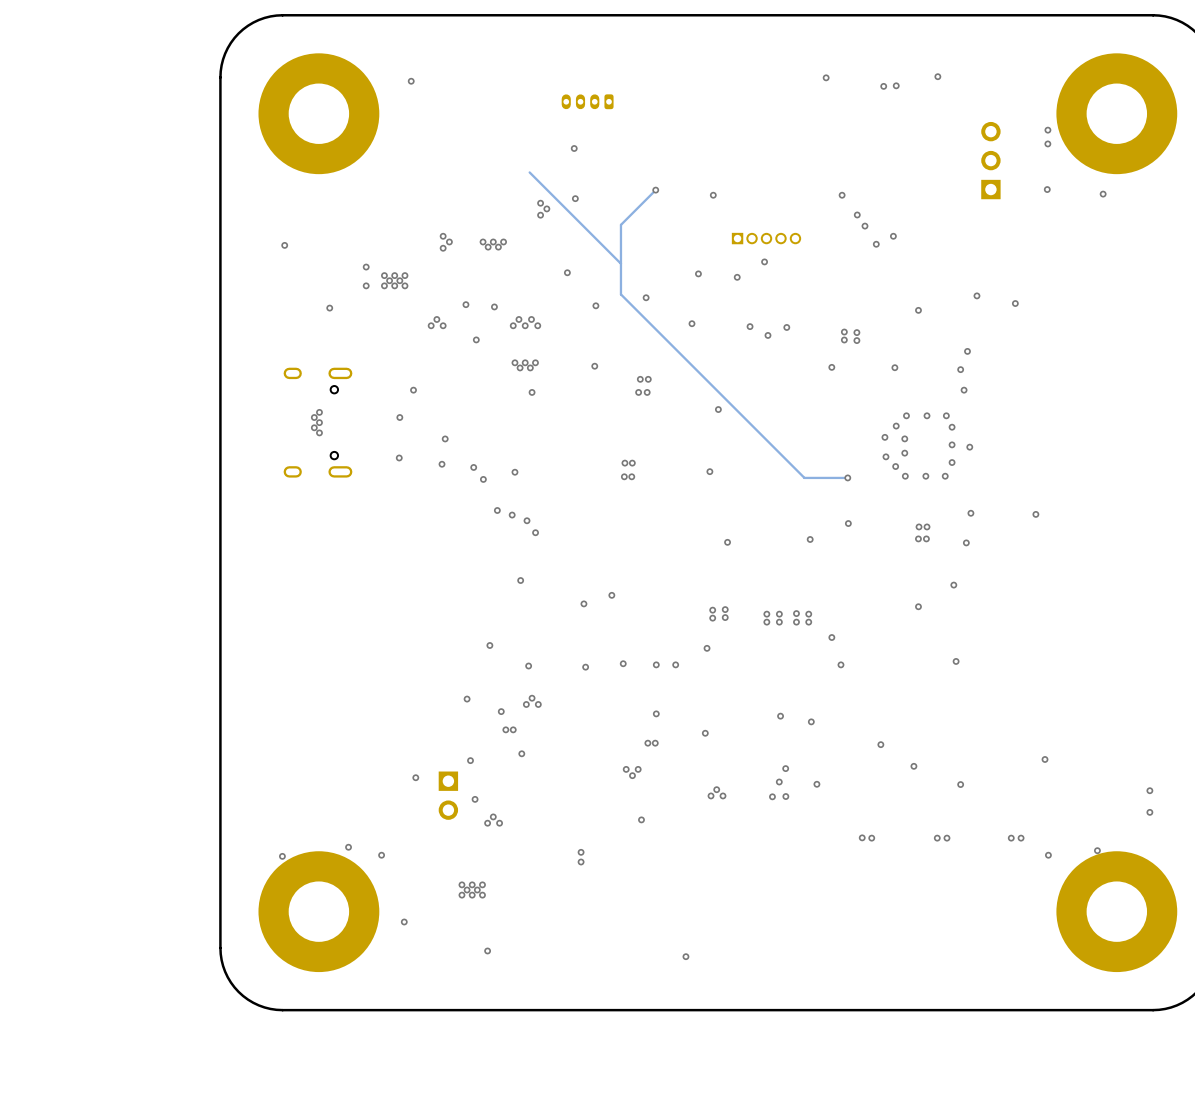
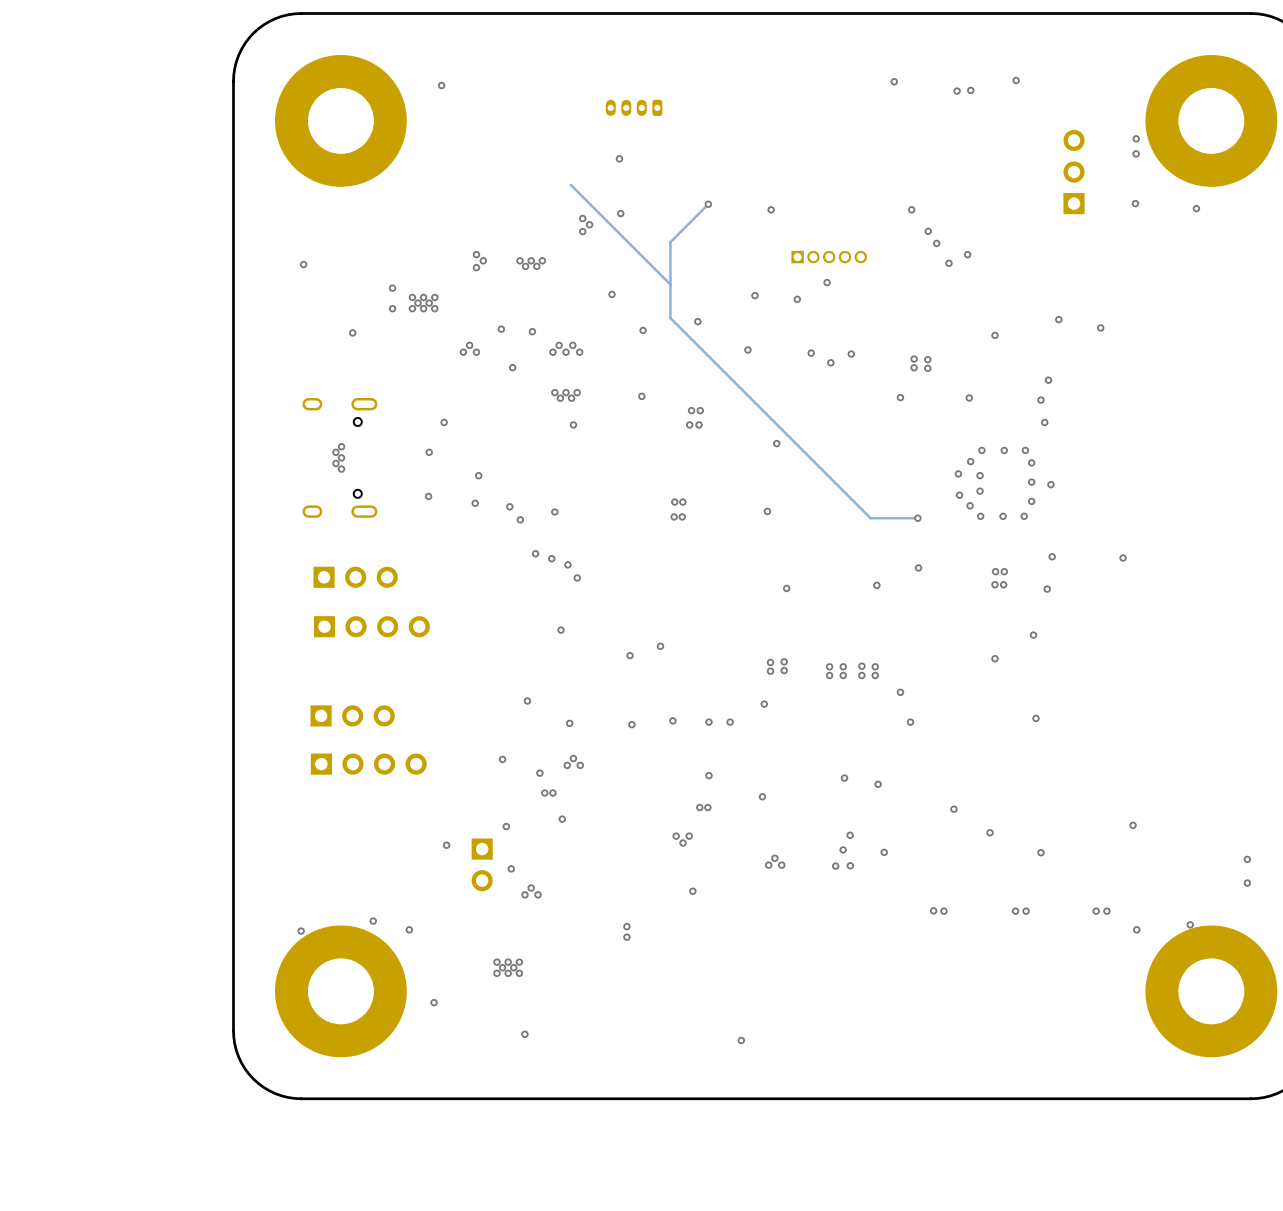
part: none -> (355, 577)
part: none -> (371, 626)
part: none -> (352, 715)
part: none -> (368, 764)

